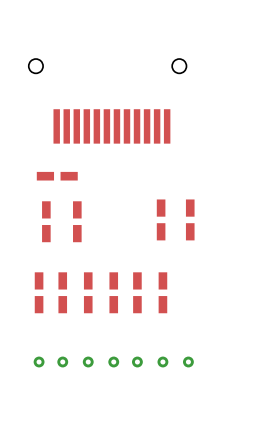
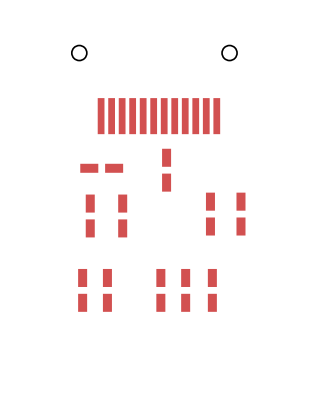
part position: (88, 292) -> (166, 170)
via: (39, 362) -> none
via: (62, 362) -> none
via: (88, 362) -> none
via: (113, 362) -> none
via: (137, 362) -> none
via: (162, 362) -> none
via: (188, 362) -> none

